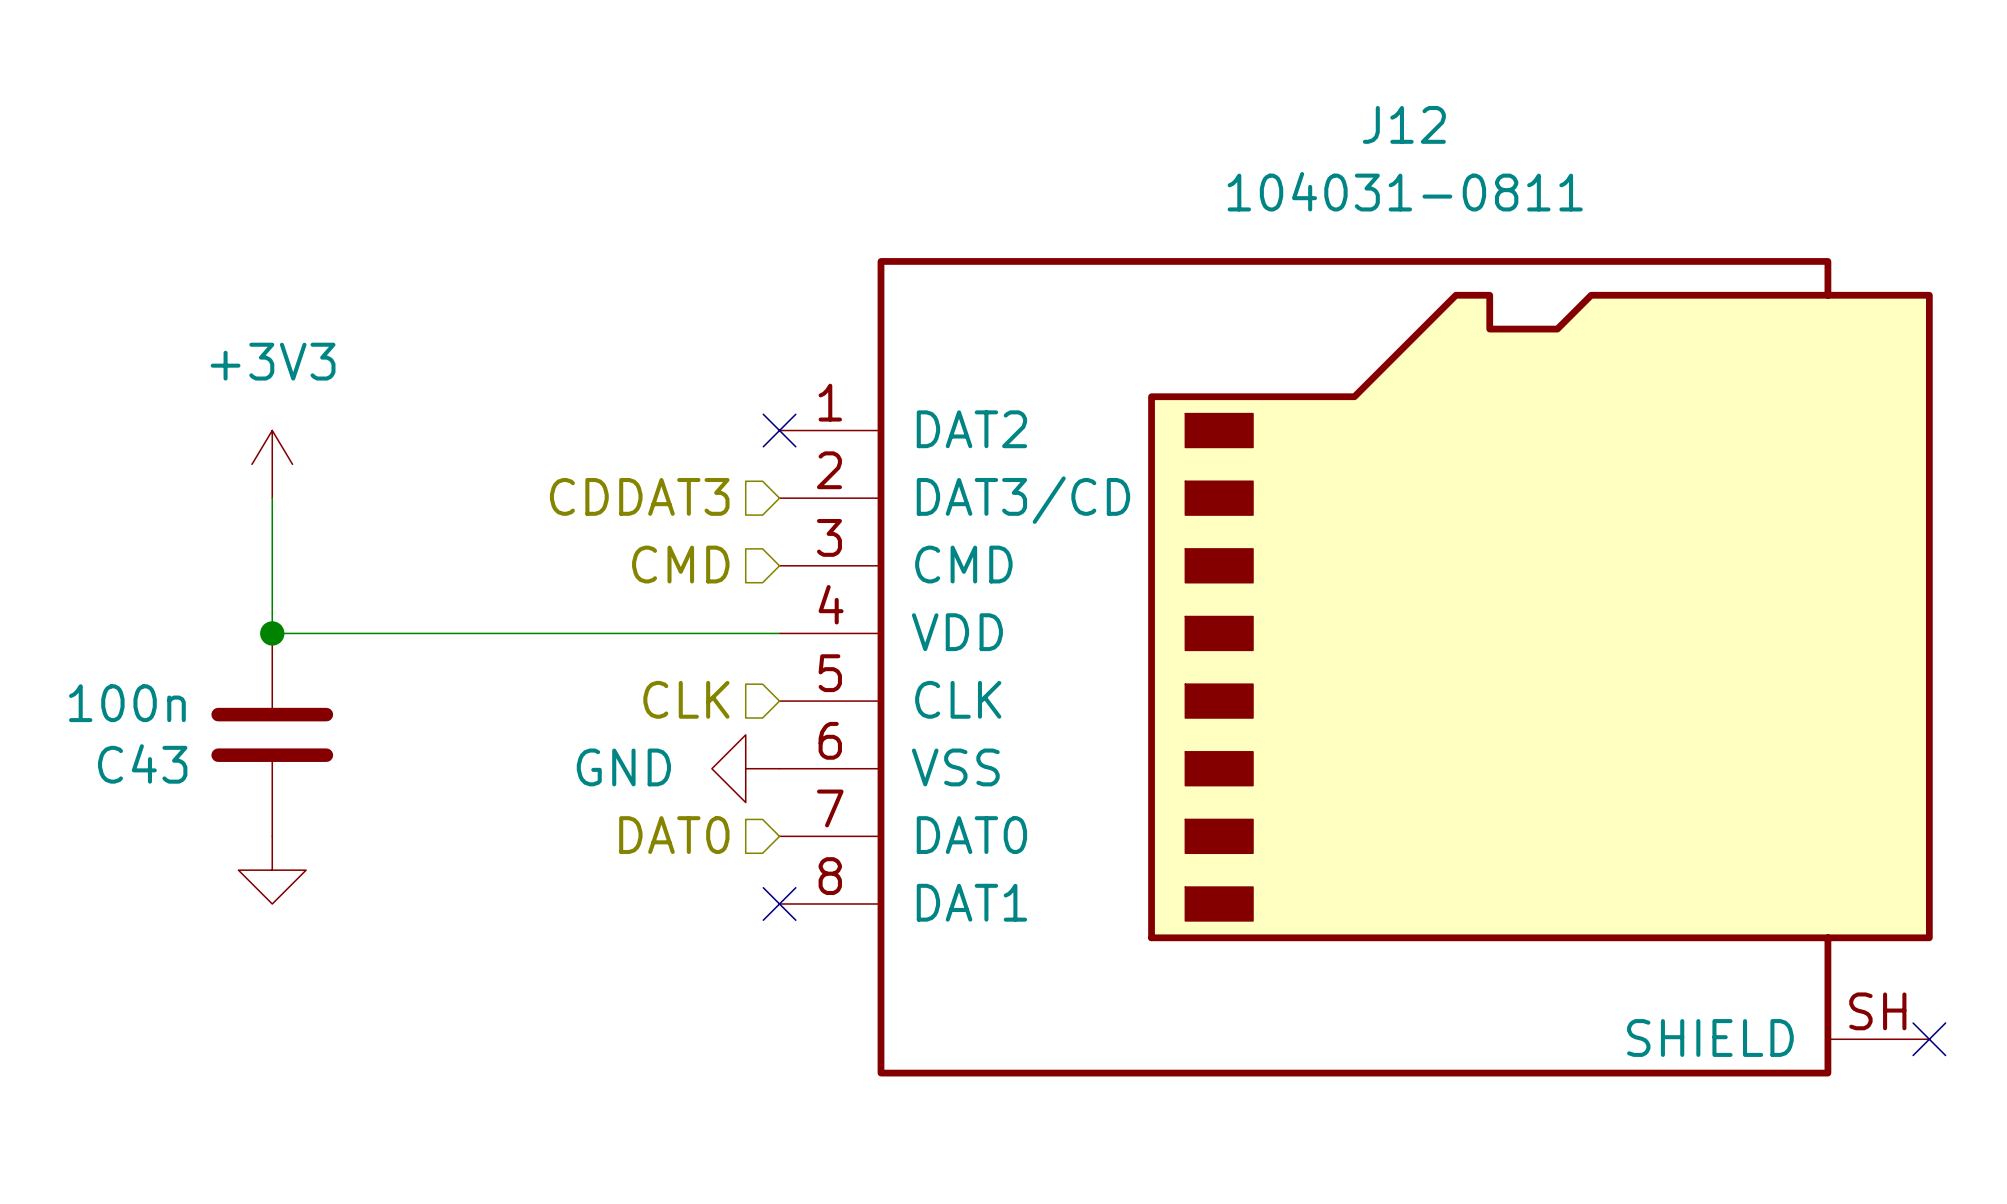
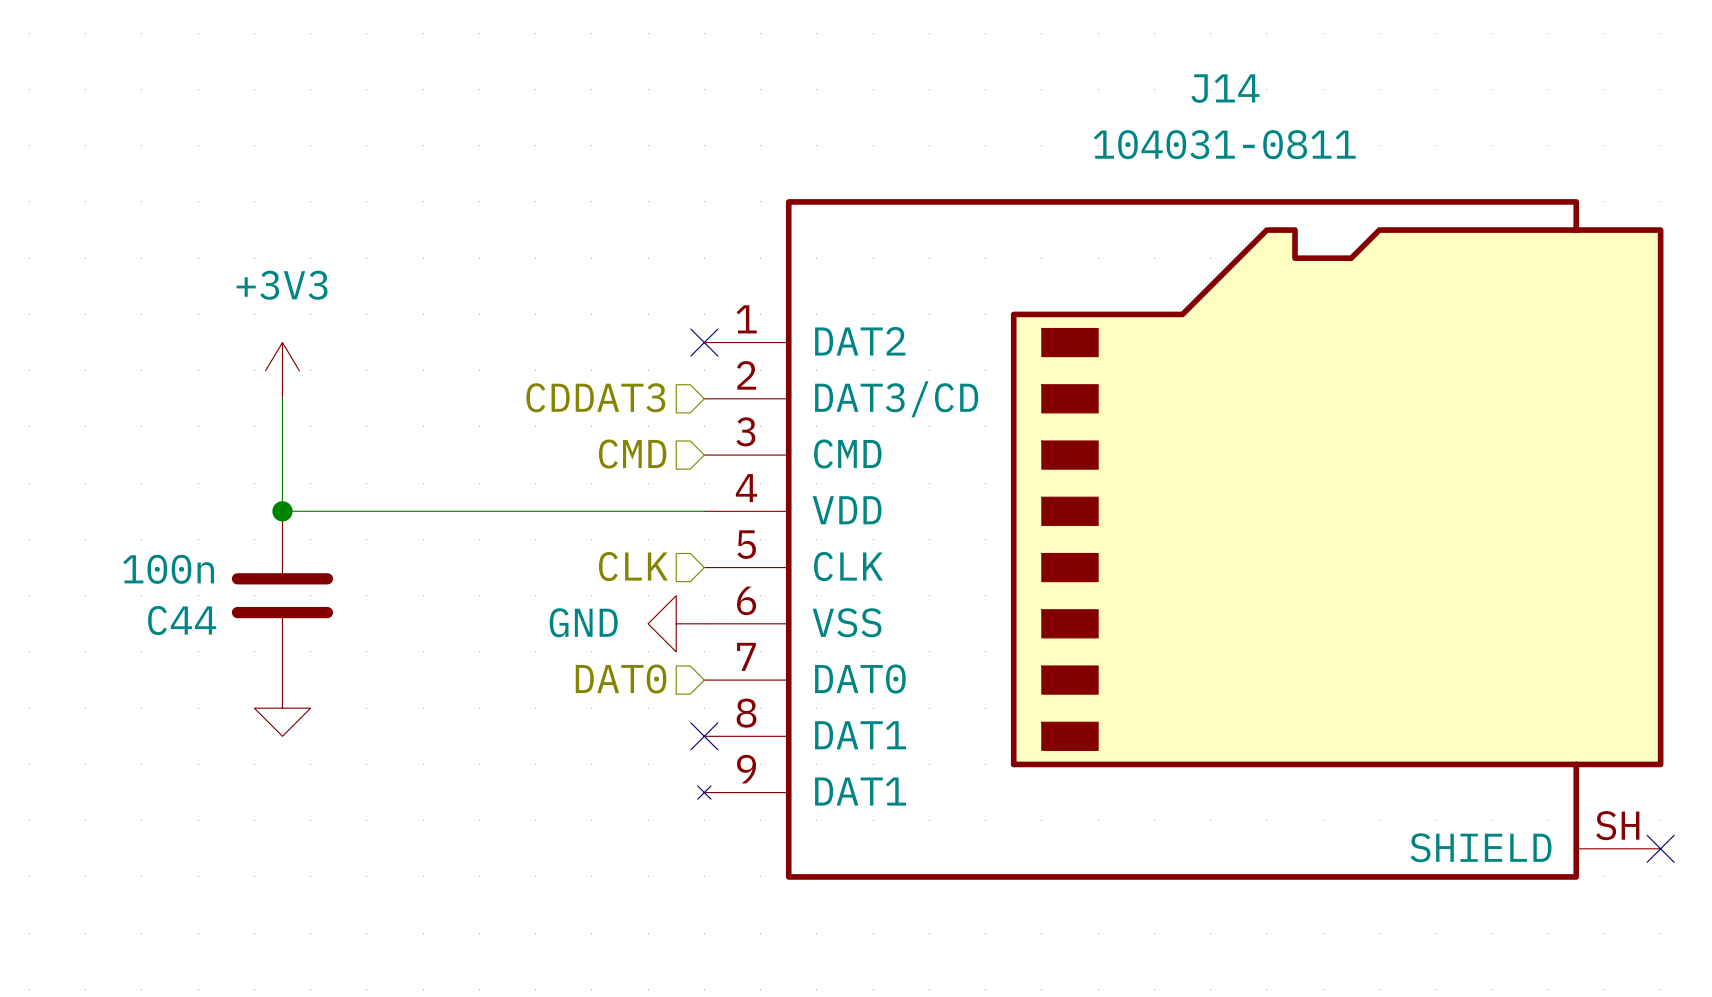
J14: none -> 104031-0811 (1180, 539)
J12: 104031-0811 (1356, 667) -> none
C43 name: C43 (142, 763) -> C44 (182, 620)

